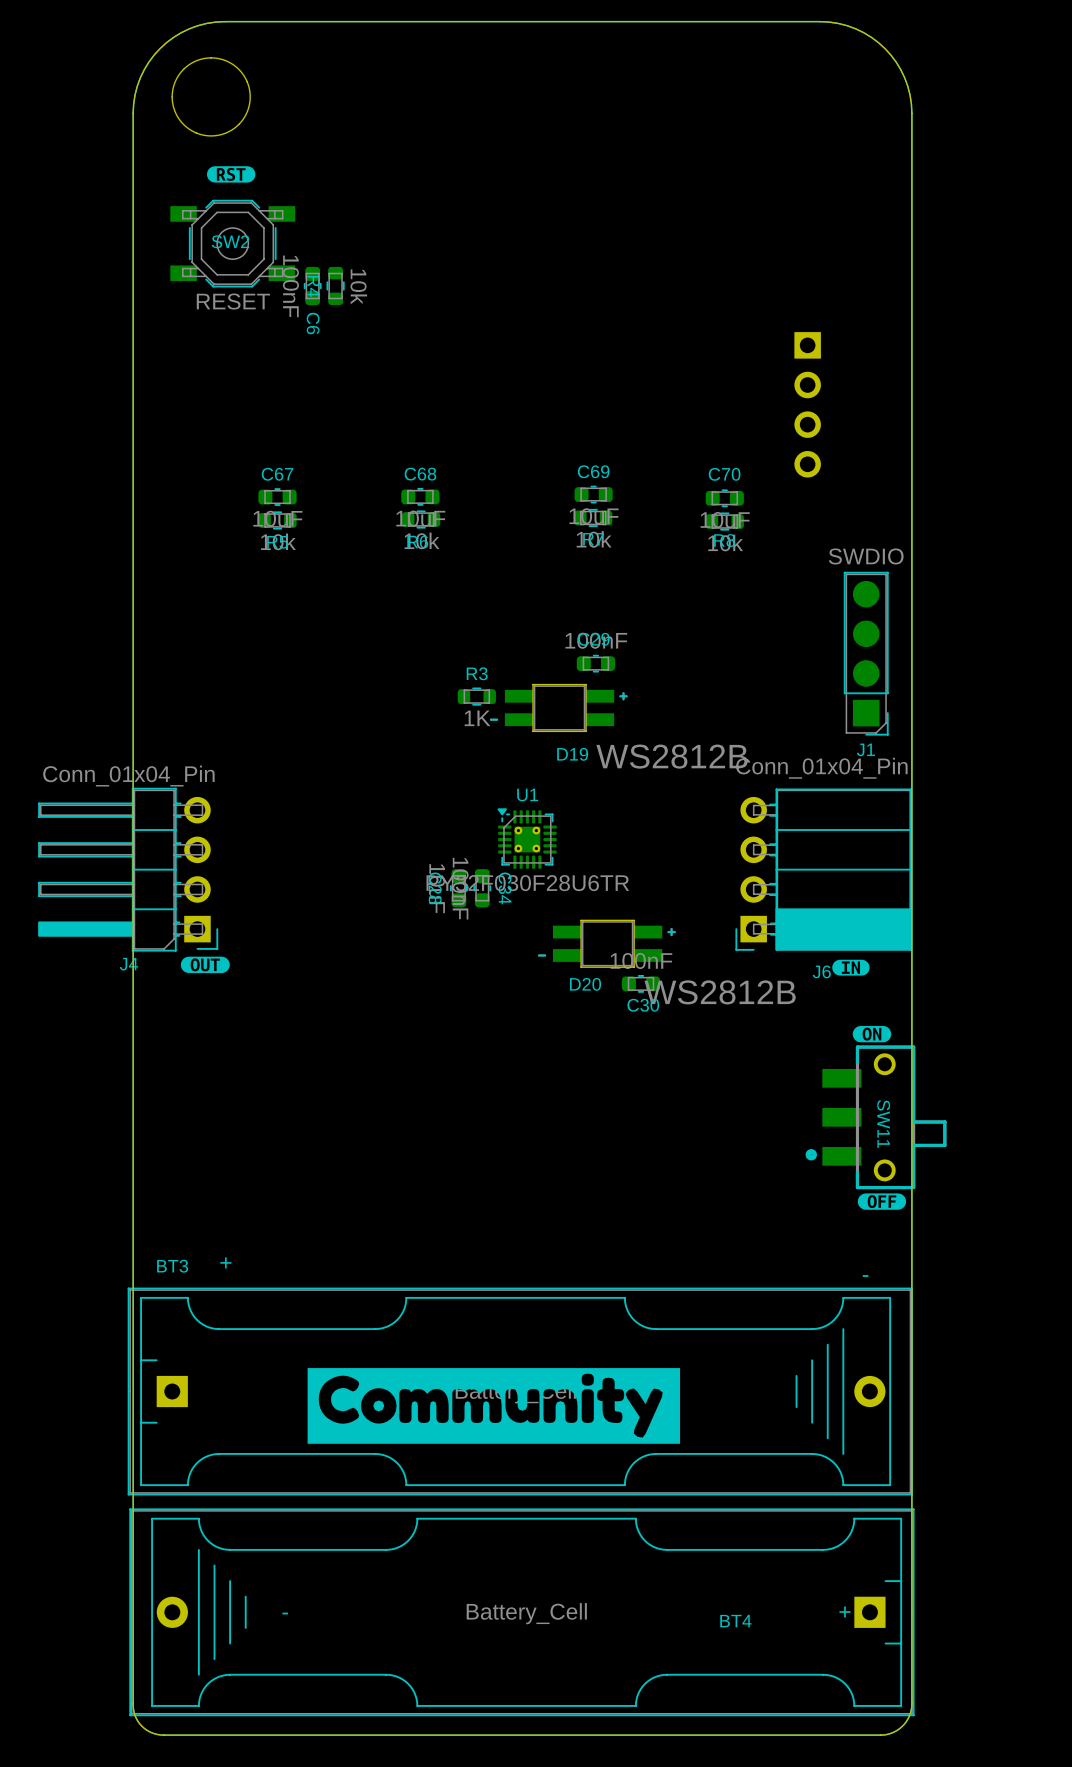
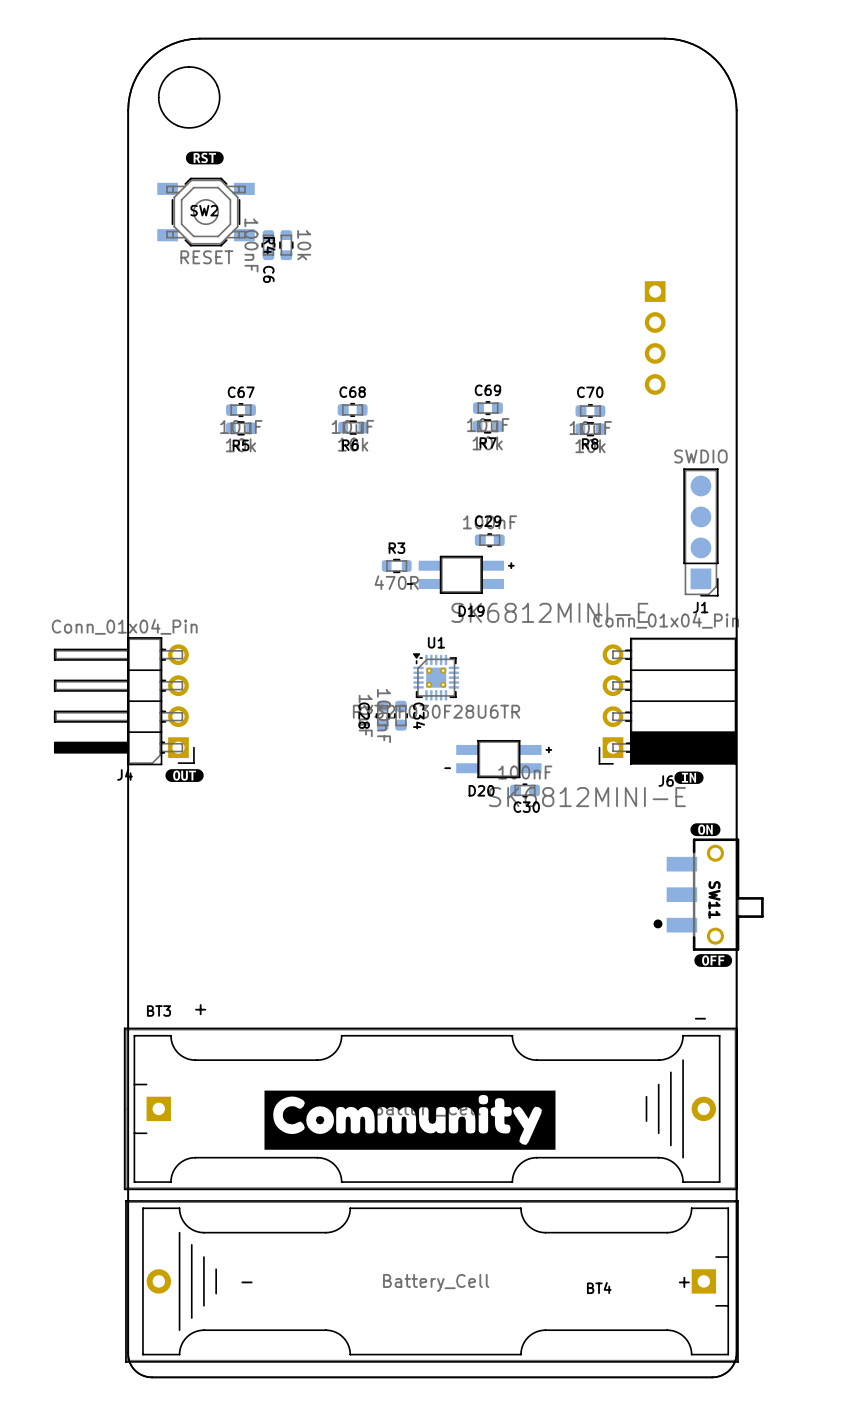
R3 value: 1K (477, 718) -> 470R (396, 582)
D19 value: WS2812B (672, 756) -> SK6812MINI-E (549, 612)
D20 value: WS2812B (720, 992) -> SK6812MINI-E (587, 797)

